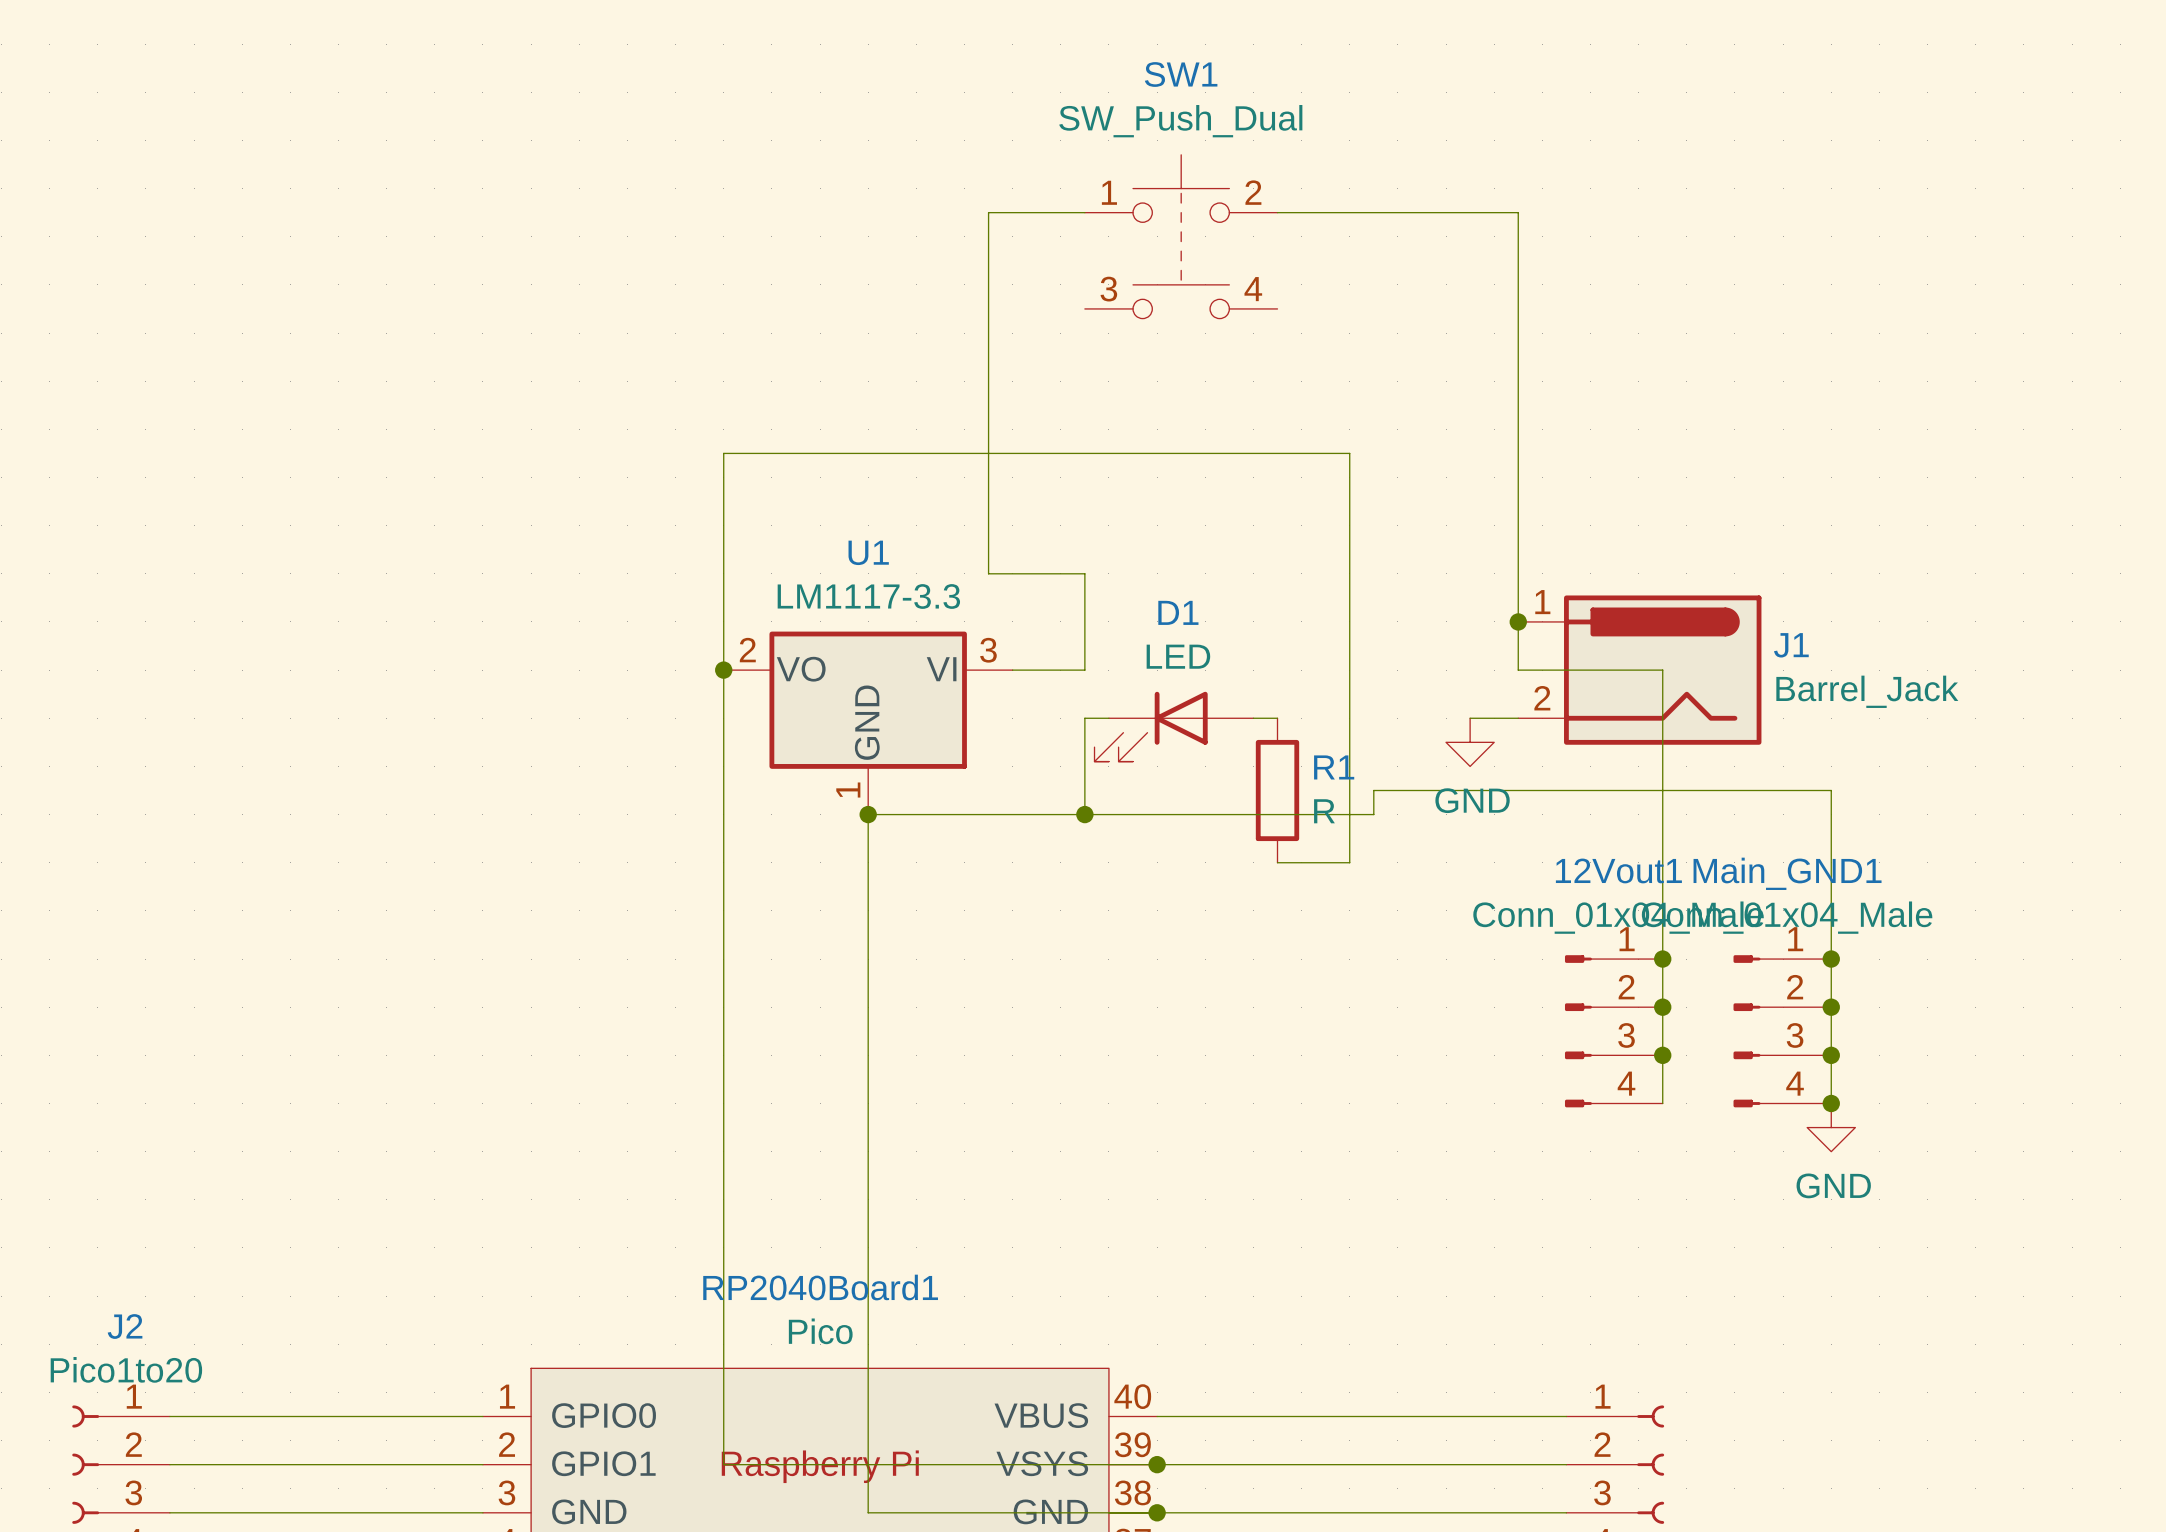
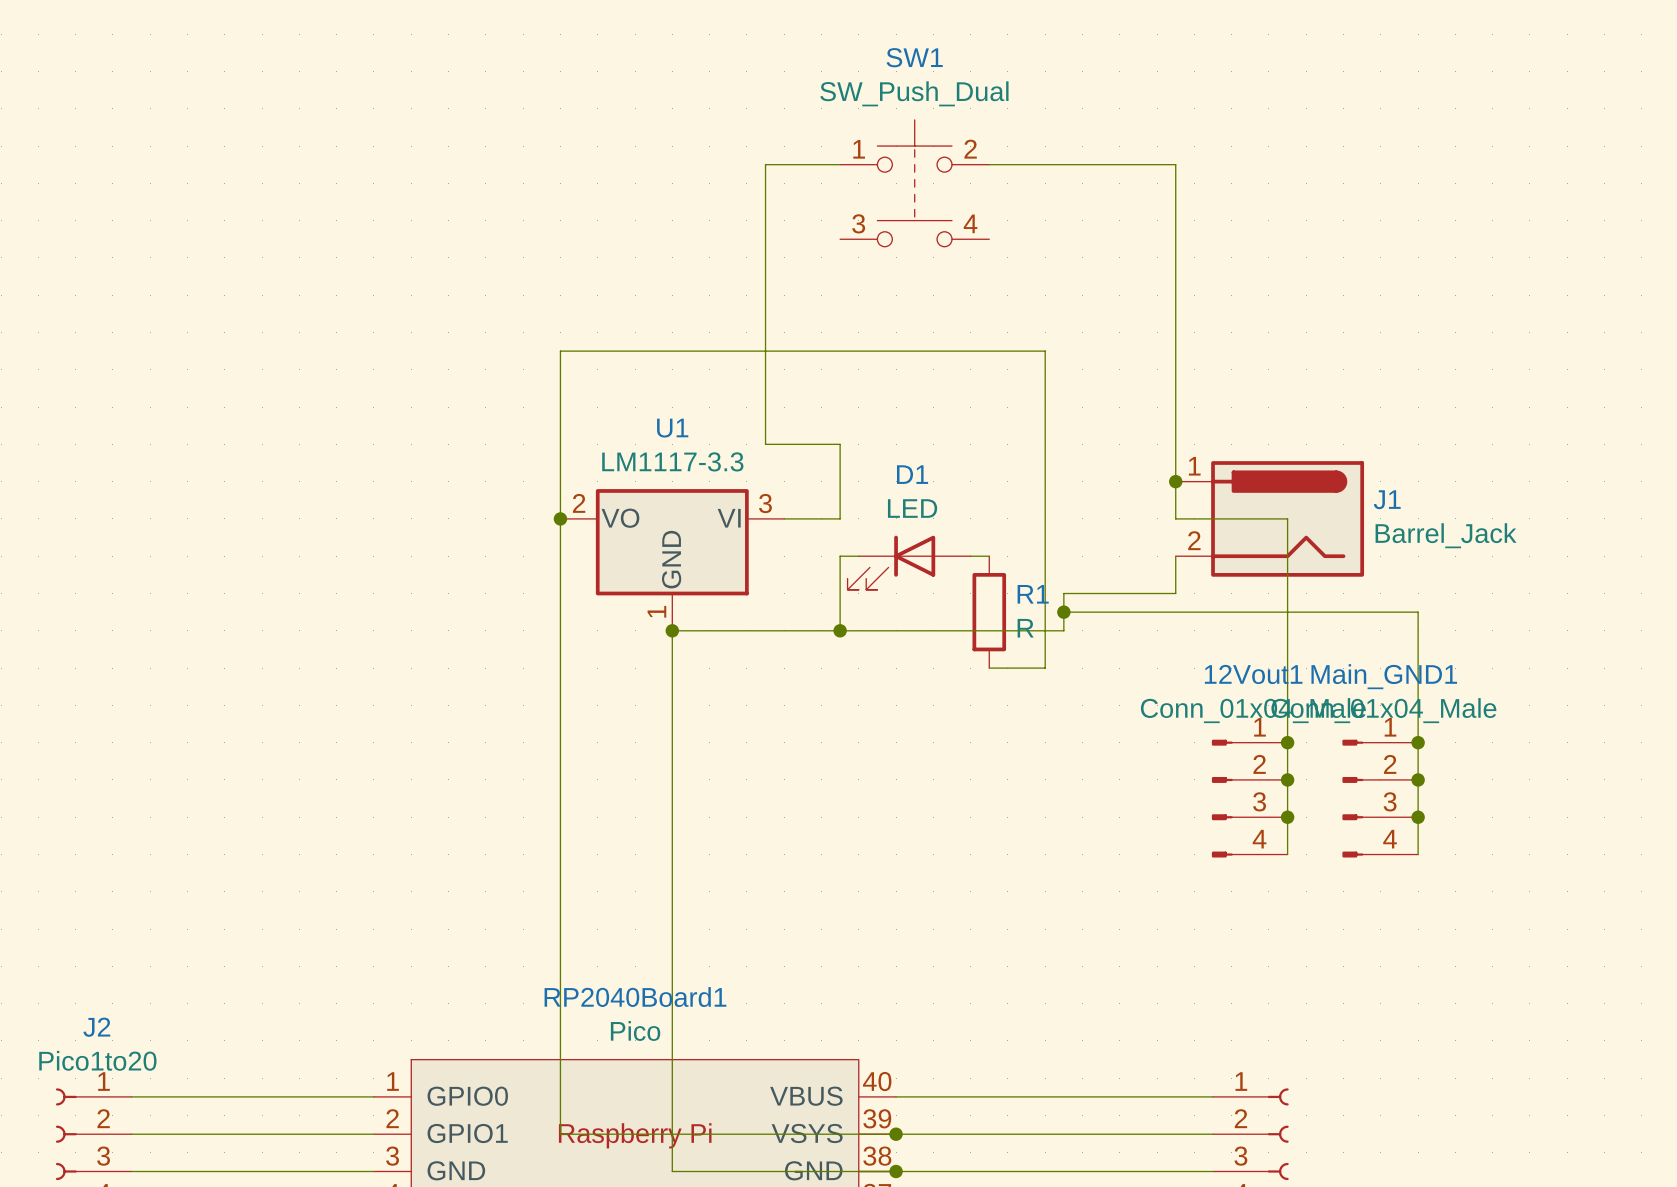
wire: (1470, 718) (1518, 718) -> (1063, 612) (1063, 593) (1175, 593) (1175, 556)
power symbol: GND (1470, 742) -> none
junction: none -> (1063, 612)
junction: (1831, 1103) -> none
power symbol: GND (1831, 1127) -> none

